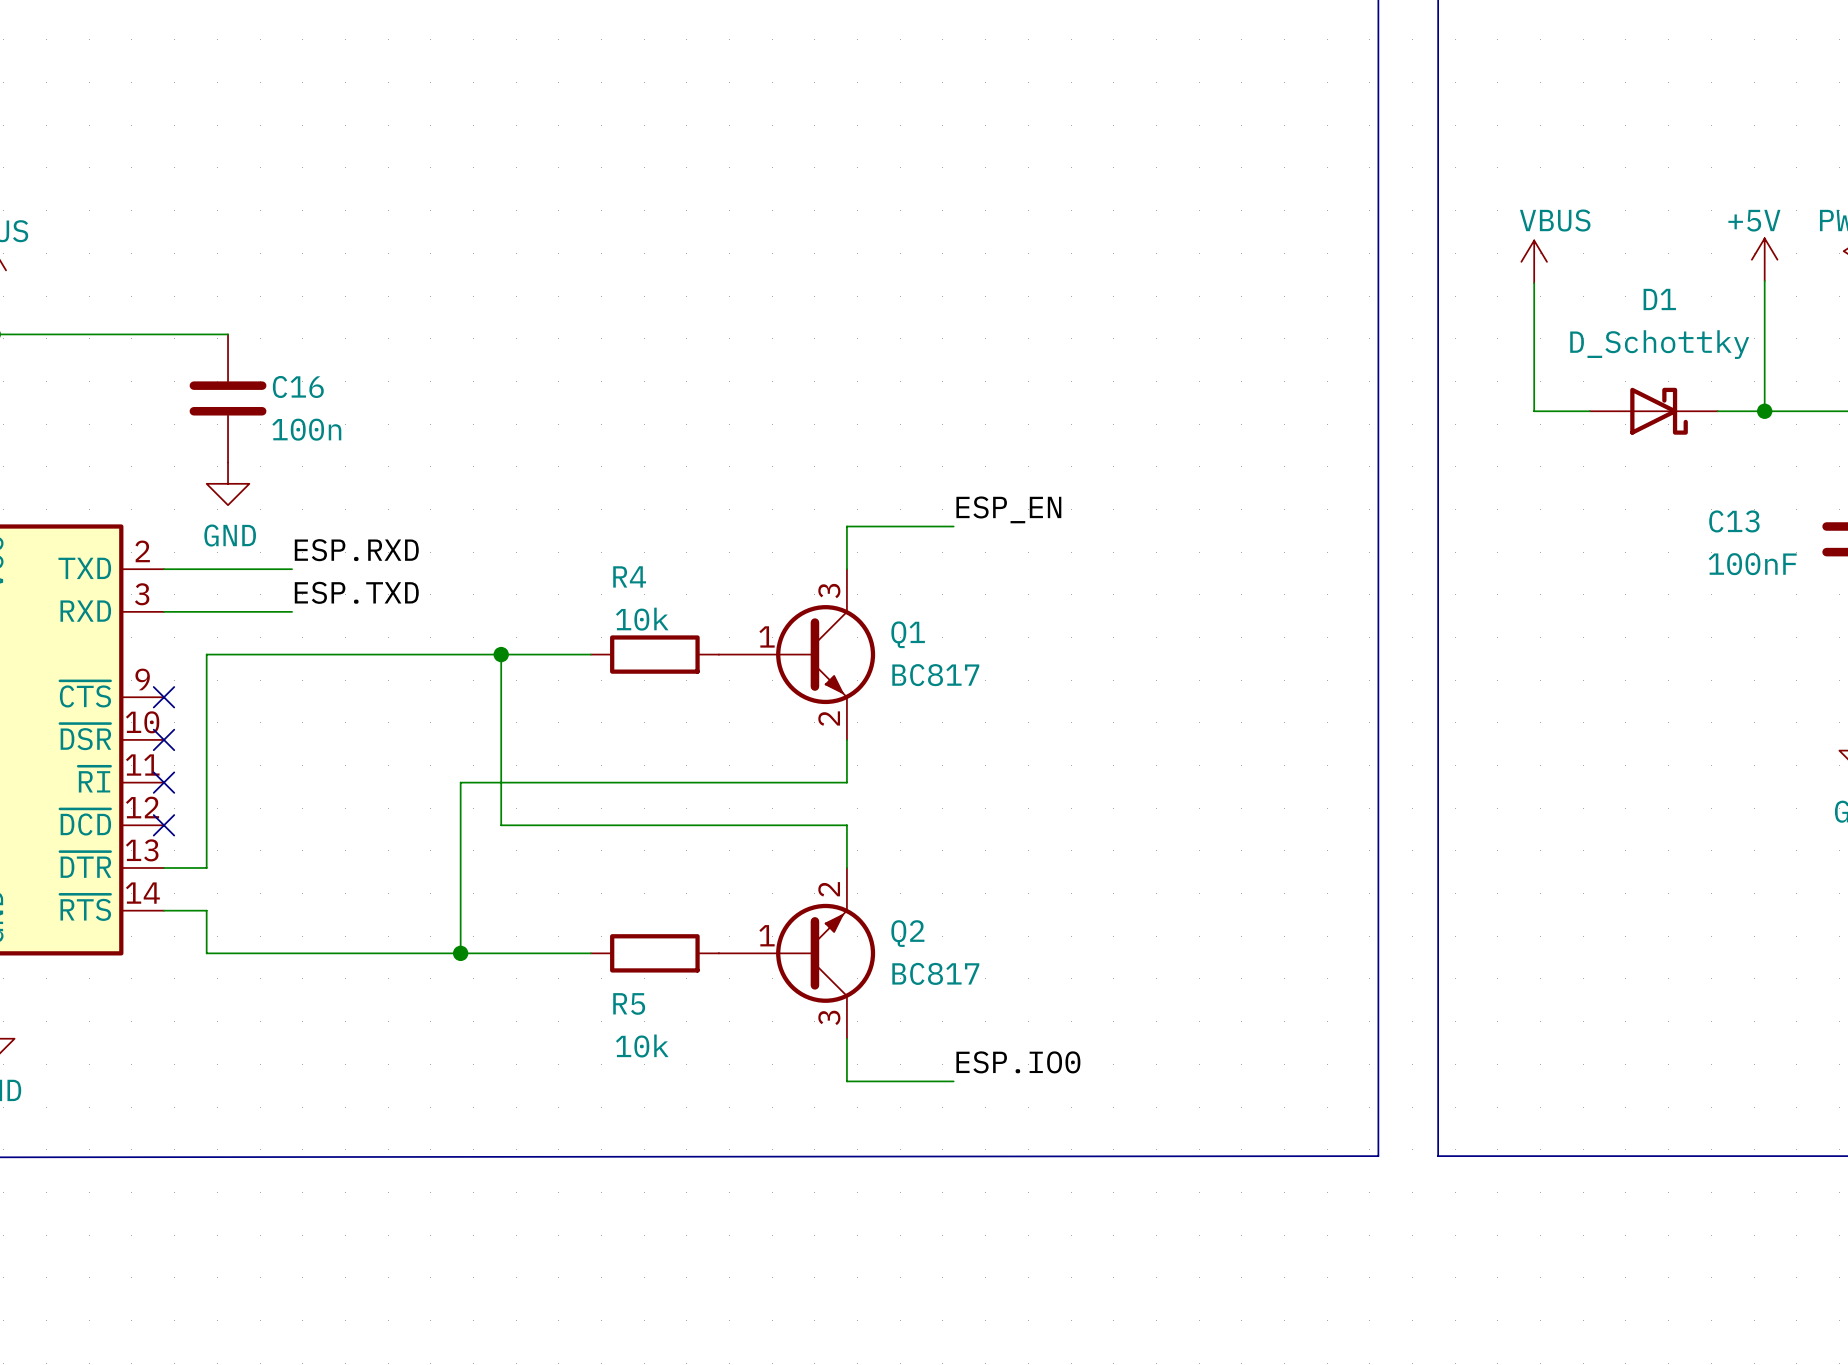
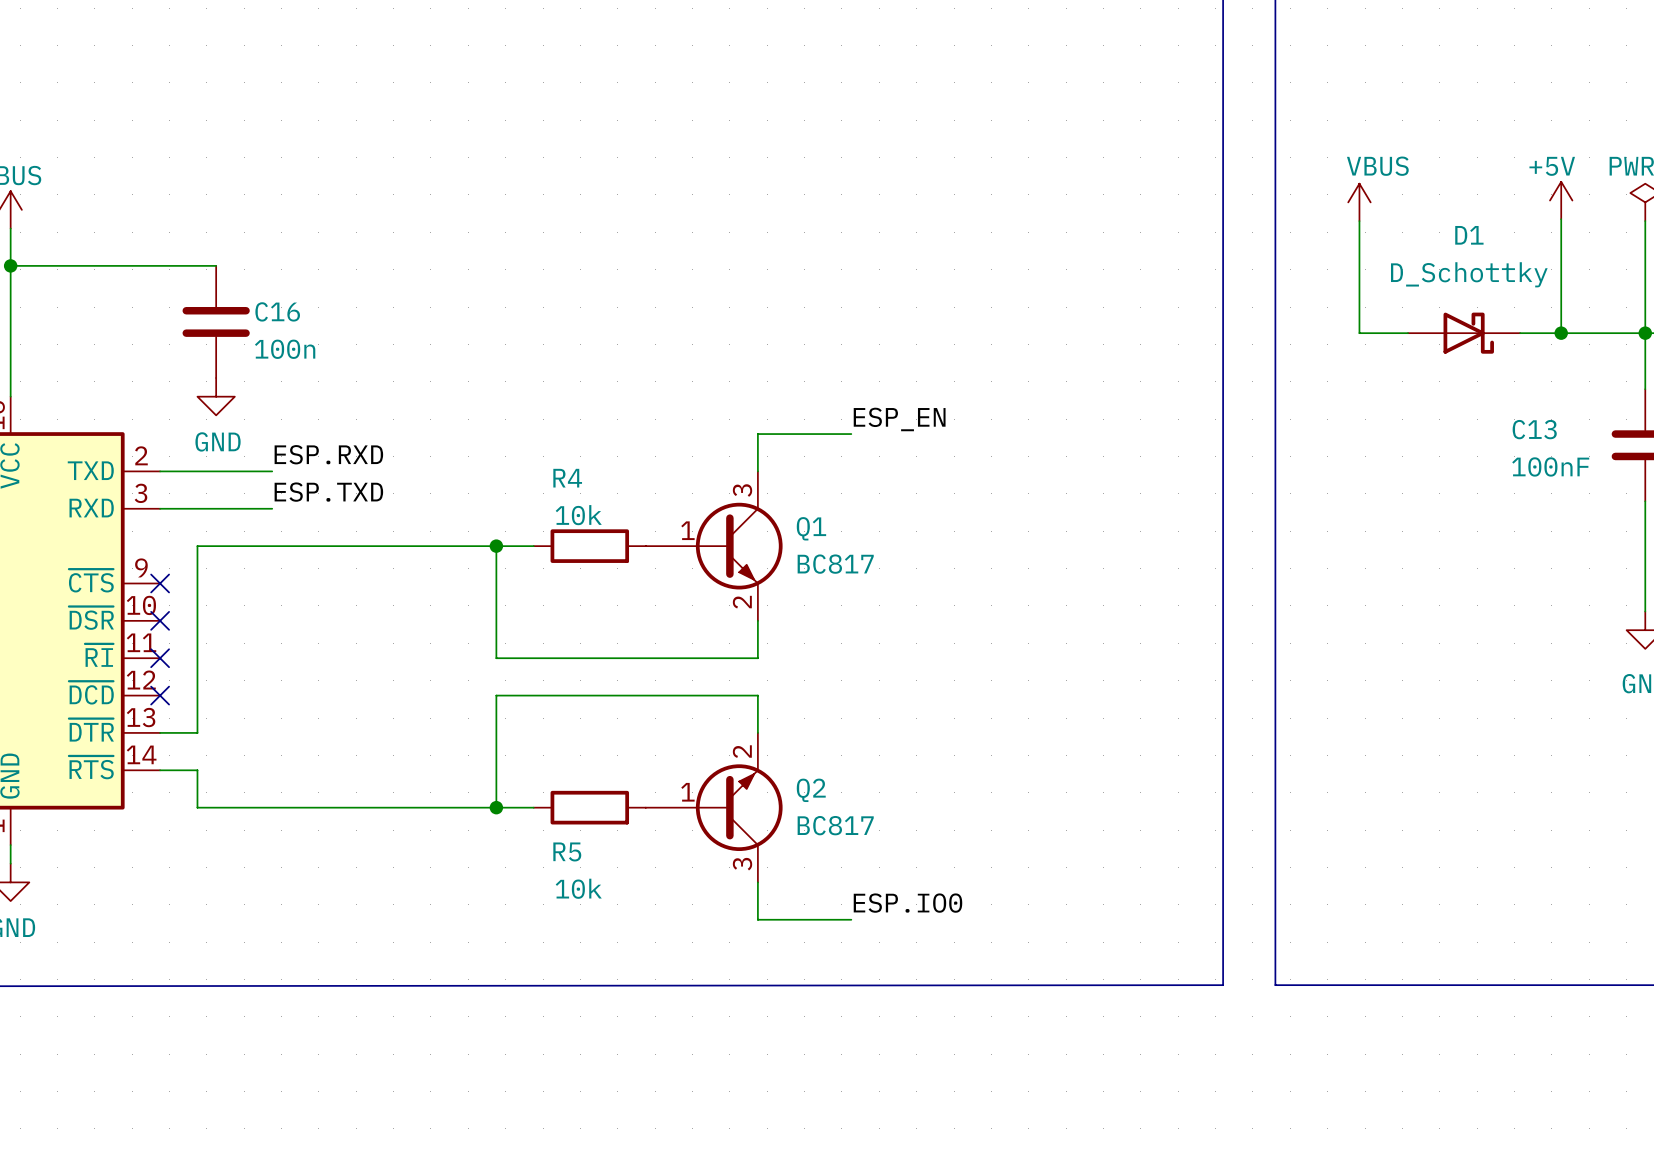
wire: (501, 654) (501, 825) (548, 825) -> (496, 807) (496, 695)
junction position: (501, 654) -> (496, 546)
wire: (548, 782) (460, 782) (460, 953) -> (496, 658) (496, 546)
junction position: (460, 953) -> (496, 807)

